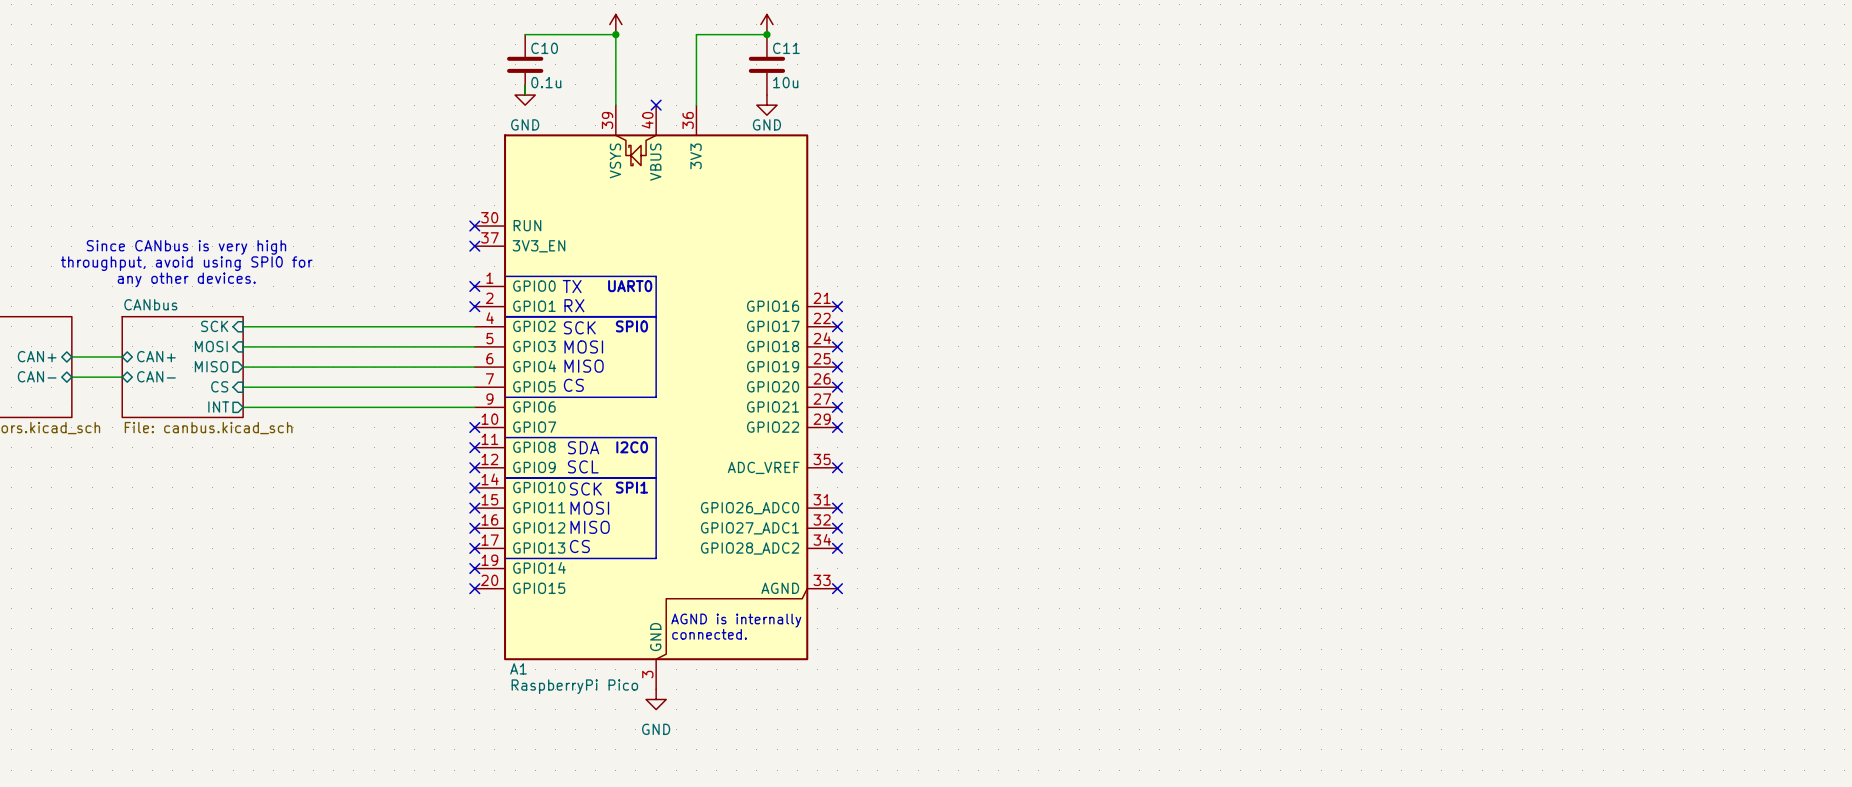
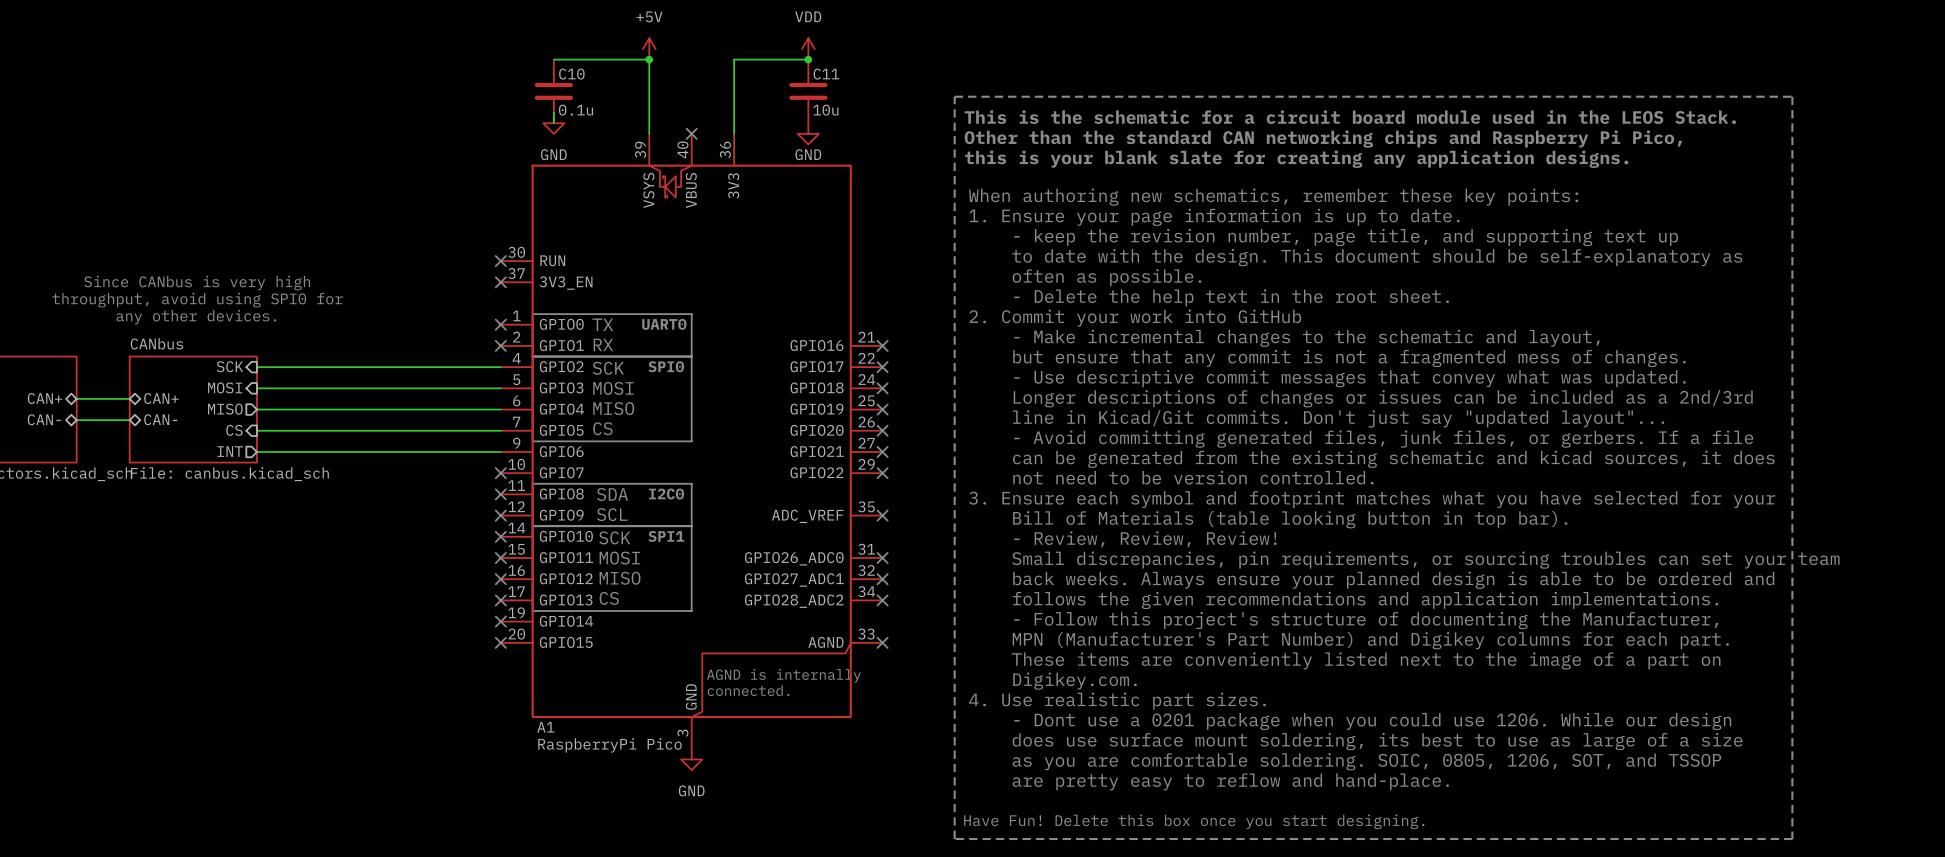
line: none -> (954, 96) (1792, 96) (1792, 839) (954, 839) (954, 96)
text: none -> This is the schematic for a circuit board module used in the LEOS Stack. (1350, 117)
text: none -> Other than the standard CAN networking chips and Raspberry Pi Pico, (1323, 139)
text: none -> this is your blank slate for creating any application designs. (1296, 159)
text: none -> When authoring new schematics, remember these key points: (1273, 197)
text: none -> 1. Ensure your page information is up to date. (1214, 217)
text: none -> - keep the revision number, page title, and supporting text up (1346, 237)
text: none -> to date with the design. This document should be self-explanatory as (1377, 257)
text: none -> often as possible. (1106, 277)
text: none -> - Delete the help text in the root sheet. (1231, 297)
text: none -> 2. Commit your work into GitHub (1135, 318)
text: none -> - Make incremental changes to the schematic and layout, (1307, 338)
text: none -> but ensure that any commit is not a fragmented mess of changes. (1349, 358)
text: none -> - Use descriptive commit messages that convey what was updated. (1350, 378)
text: none -> Longer descriptions of changes or issues can be included as a 2nd/3rd (1383, 398)
text: none -> line in Kicad/Git commits. Don't just say "updated layout"... (1338, 418)
text: none -> - Avoid committing generated files, junk files, or gerbers. If a file (1383, 439)
text: none -> can be generated from the existing schematic and kicad sources, it does (1393, 459)
text: none -> not need to be version controlled. (1193, 477)
text: none -> 3. Ensure each symbol and footprint matches what you have selected for your (1372, 499)
text: none -> Bill of Materials (table looking button in top bar). (1290, 519)
text: none -> - Review, Review, Review! (1145, 539)
text: none -> Small discrepancies, pin requirements, or sourcing troubles can set your team (1425, 560)
text: none -> back weeks. Always ensure your planned design is able to be ordered and (1393, 580)
text: none -> follows the given recommendations and application implementations. (1365, 600)
text: none -> - Follow this project's structure of documenting the Manufacturer, (1366, 620)
text: none -> MPN (Manufacturer's Part Number) and Digikey columns for each part. (1370, 640)
text: none -> These items are conveniently listed next to the image of a part on (1366, 660)
text: none -> Digikey.com. (1074, 681)
text: none -> 4. Use realistic part sizes. (1117, 701)
text: none -> - Dont use a 0201 package when you could use 1206. While our design (1372, 721)
text: none -> does use surface mount soldering, its best to use as large of a size (1377, 741)
text: none -> as you are comfortable soldering. SOIC, 0805, 1206, SOT, and TSSOP (1366, 761)
text: none -> are pretty easy to reflow and hand-place. (1230, 781)
text: none -> Have Fun! Delete this box once you start designing. (1194, 821)

